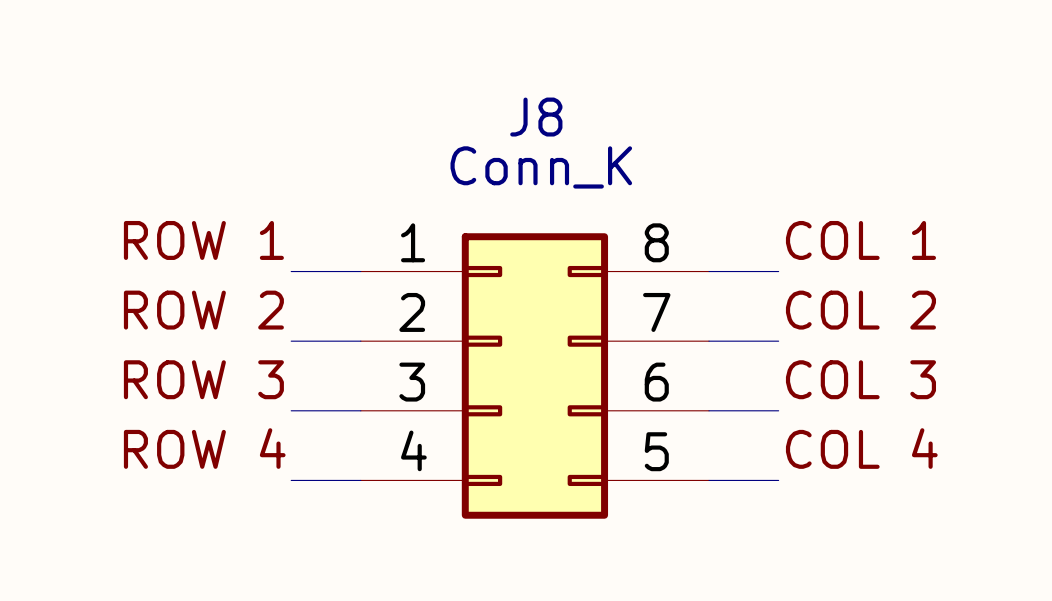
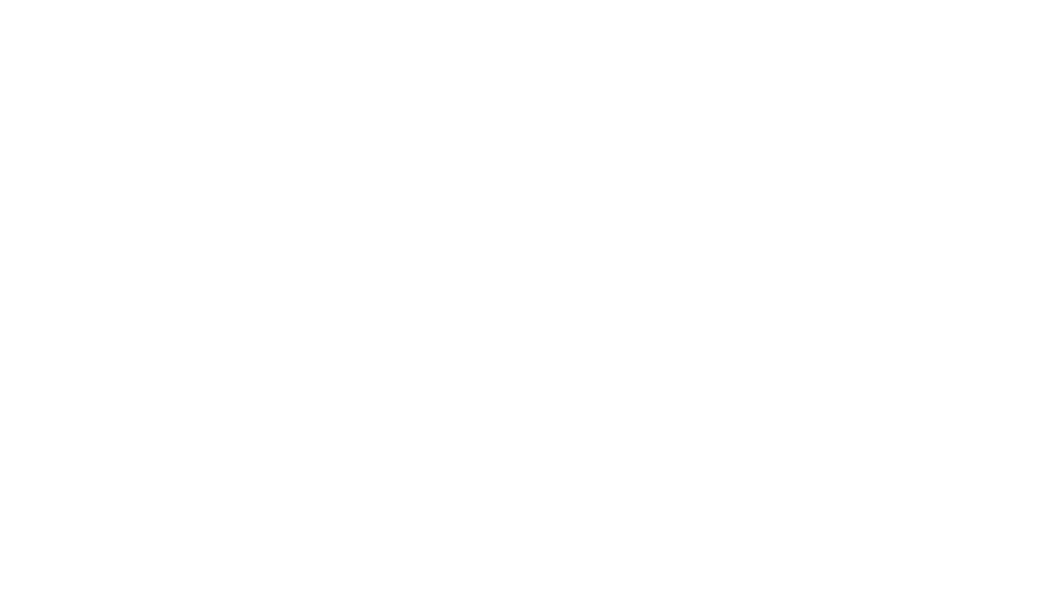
label: ROW 1 (203, 240) -> none
label: COL 1 (860, 240) -> none
wire: (291, 271) (360, 271) -> none
wire: (709, 271) (778, 271) -> none
label: ROW 2 (203, 310) -> none
label: COL 2 (860, 310) -> none
wire: (291, 341) (360, 341) -> none
wire: (709, 341) (778, 341) -> none
J8: Conn_K (534, 375) -> none
label: ROW 3 (203, 379) -> none
label: COL 3 (860, 379) -> none
wire: (291, 410) (360, 410) -> none
wire: (709, 410) (778, 410) -> none
label: ROW 4 (204, 448) -> none
label: COL 4 (861, 448) -> none
wire: (291, 480) (360, 480) -> none
wire: (709, 480) (778, 480) -> none

